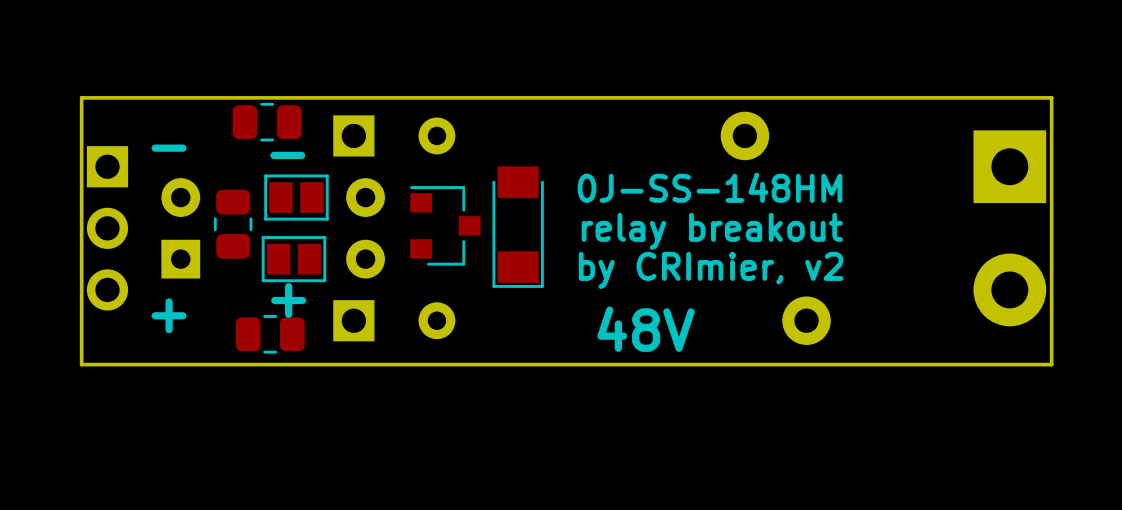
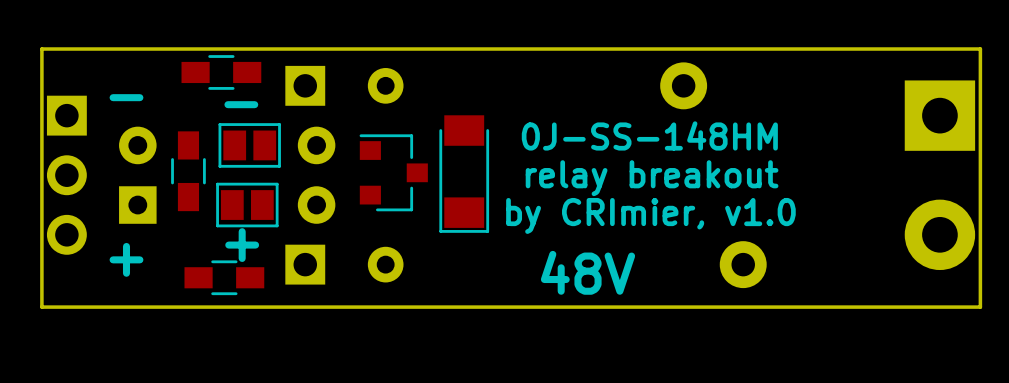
part footprint: [232, 102, 302, 142] -> [181, 55, 262, 90]
part footprint: [213, 189, 253, 259] -> [171, 131, 206, 212]
text: by CRImier, v2 (711, 270) -> by CRImier, v1.0 (650, 215)
part footprint: [235, 315, 305, 354] -> [184, 260, 265, 296]

